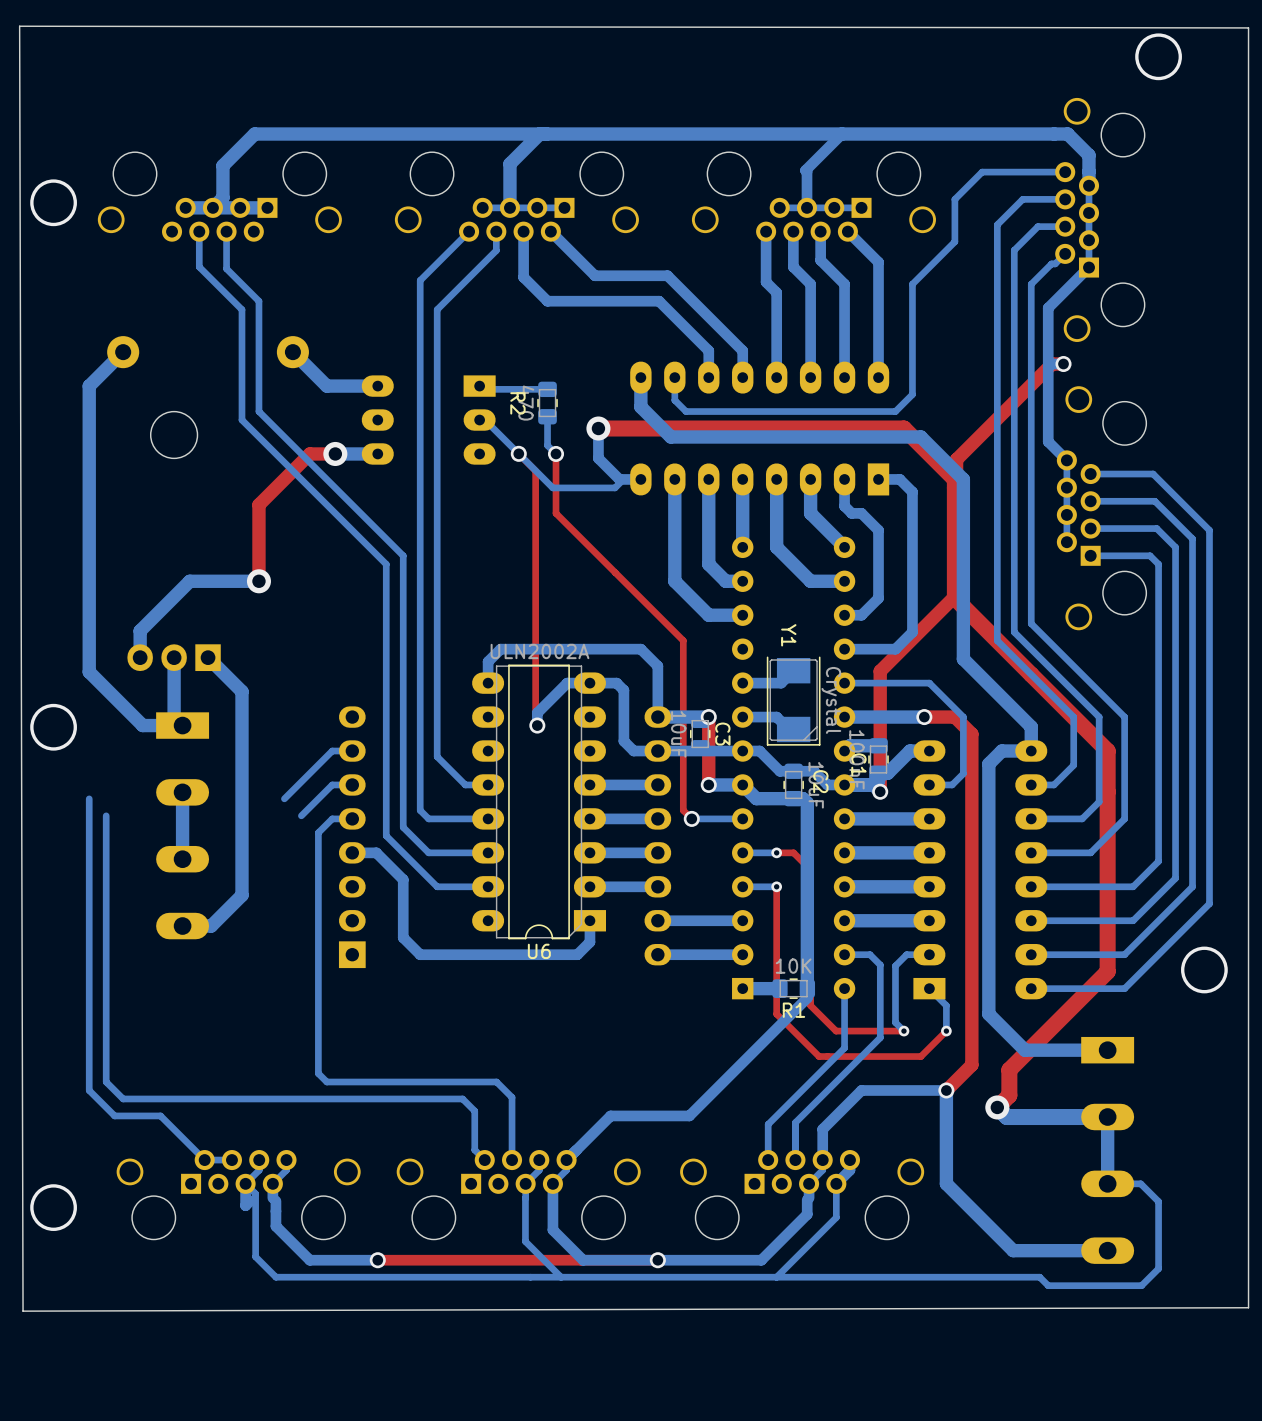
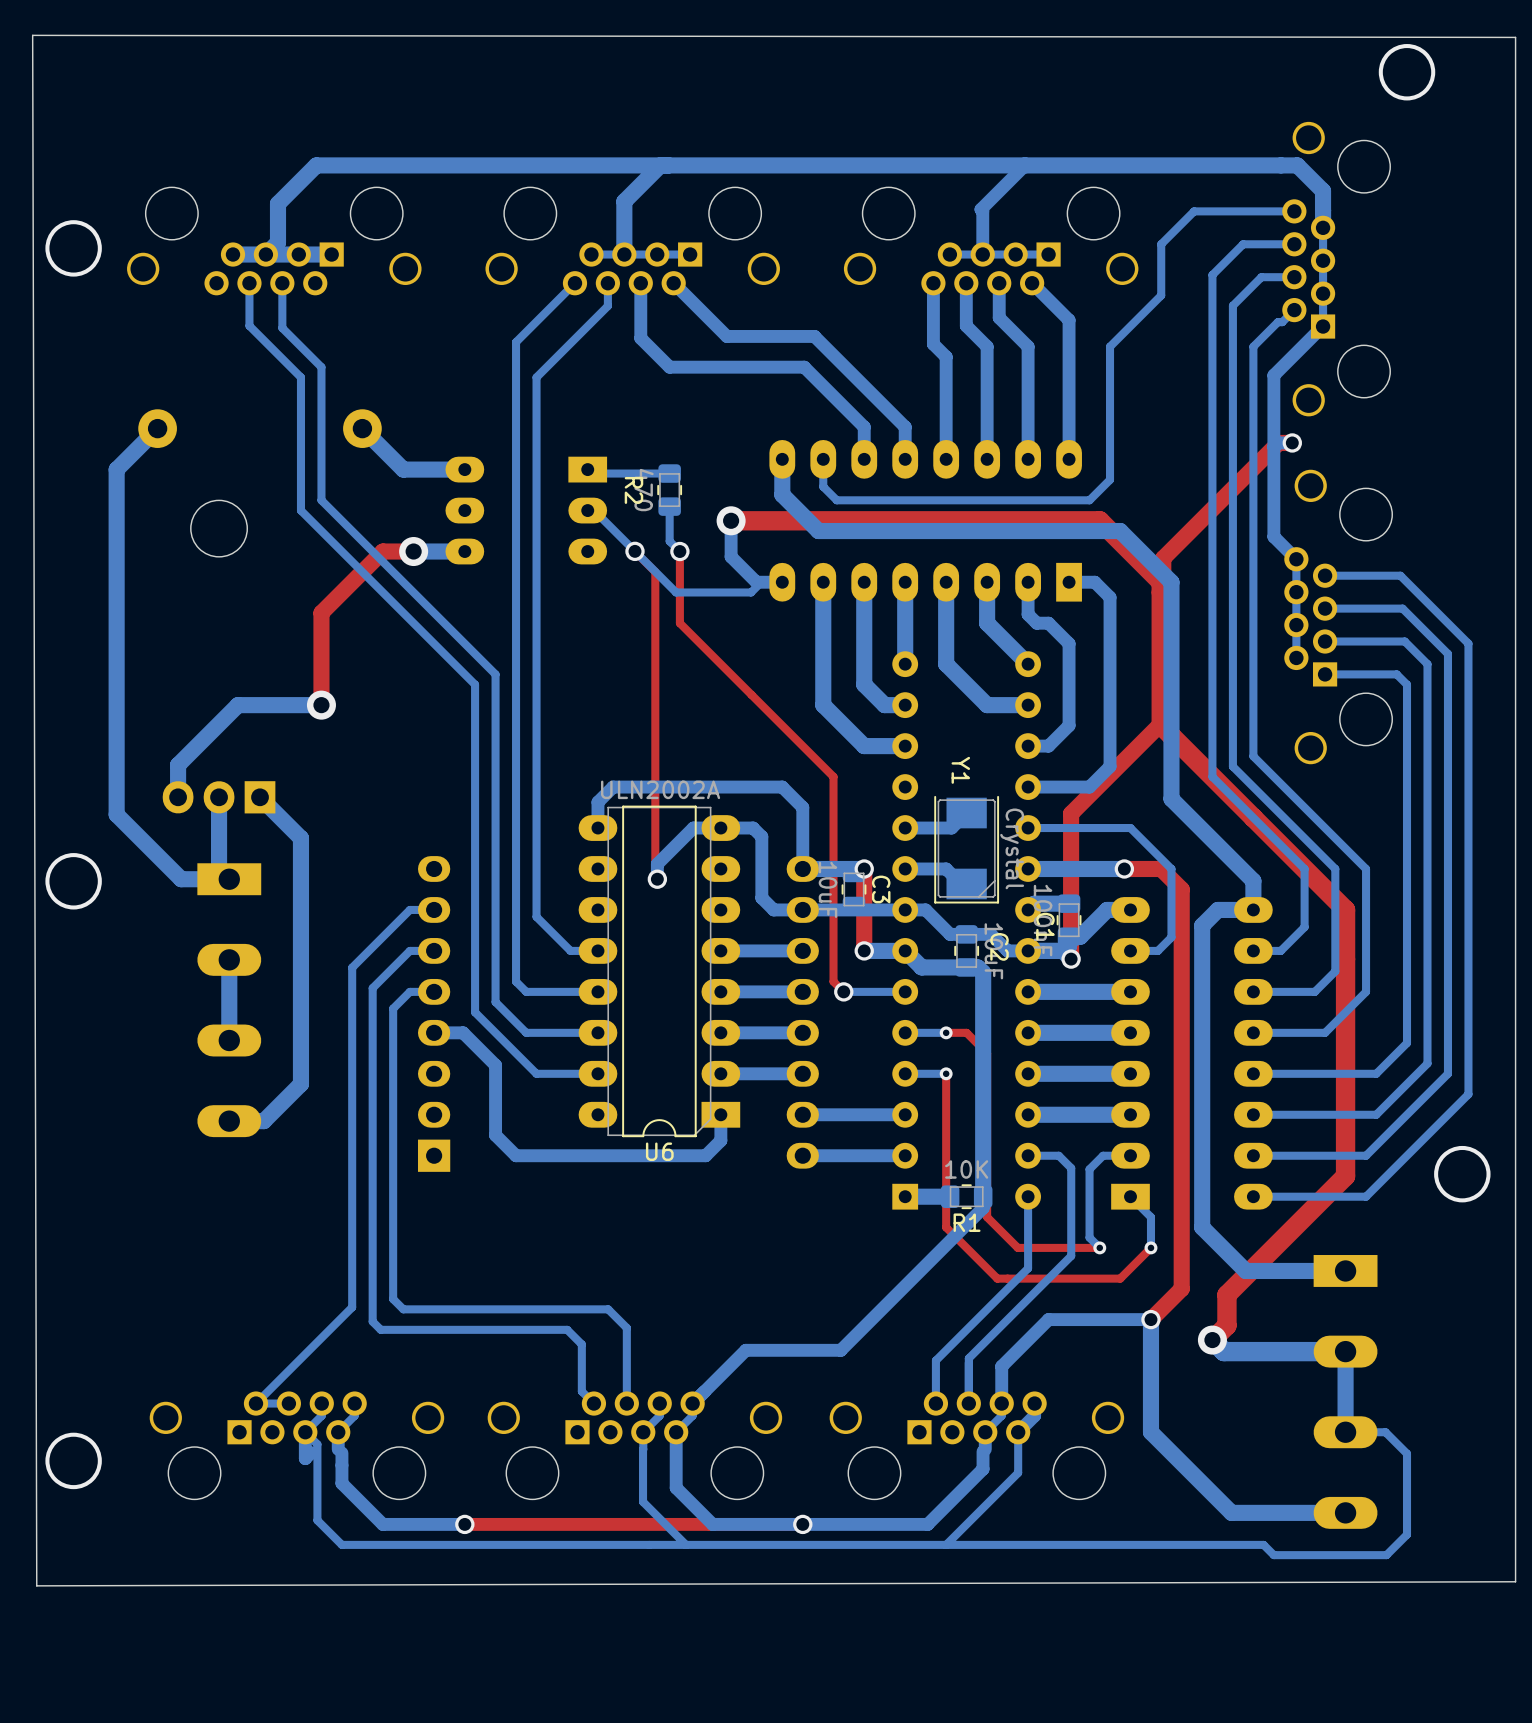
bottom track: (89, 798) (89, 1090) (114, 1115) (160, 1115) (204, 1160) -> (352, 967) (352, 1307) (255, 1403)
bottom track: (106, 815) (106, 1082) (123, 1098) (308, 1098) -> (372, 988) (372, 1321) (380, 1329)

